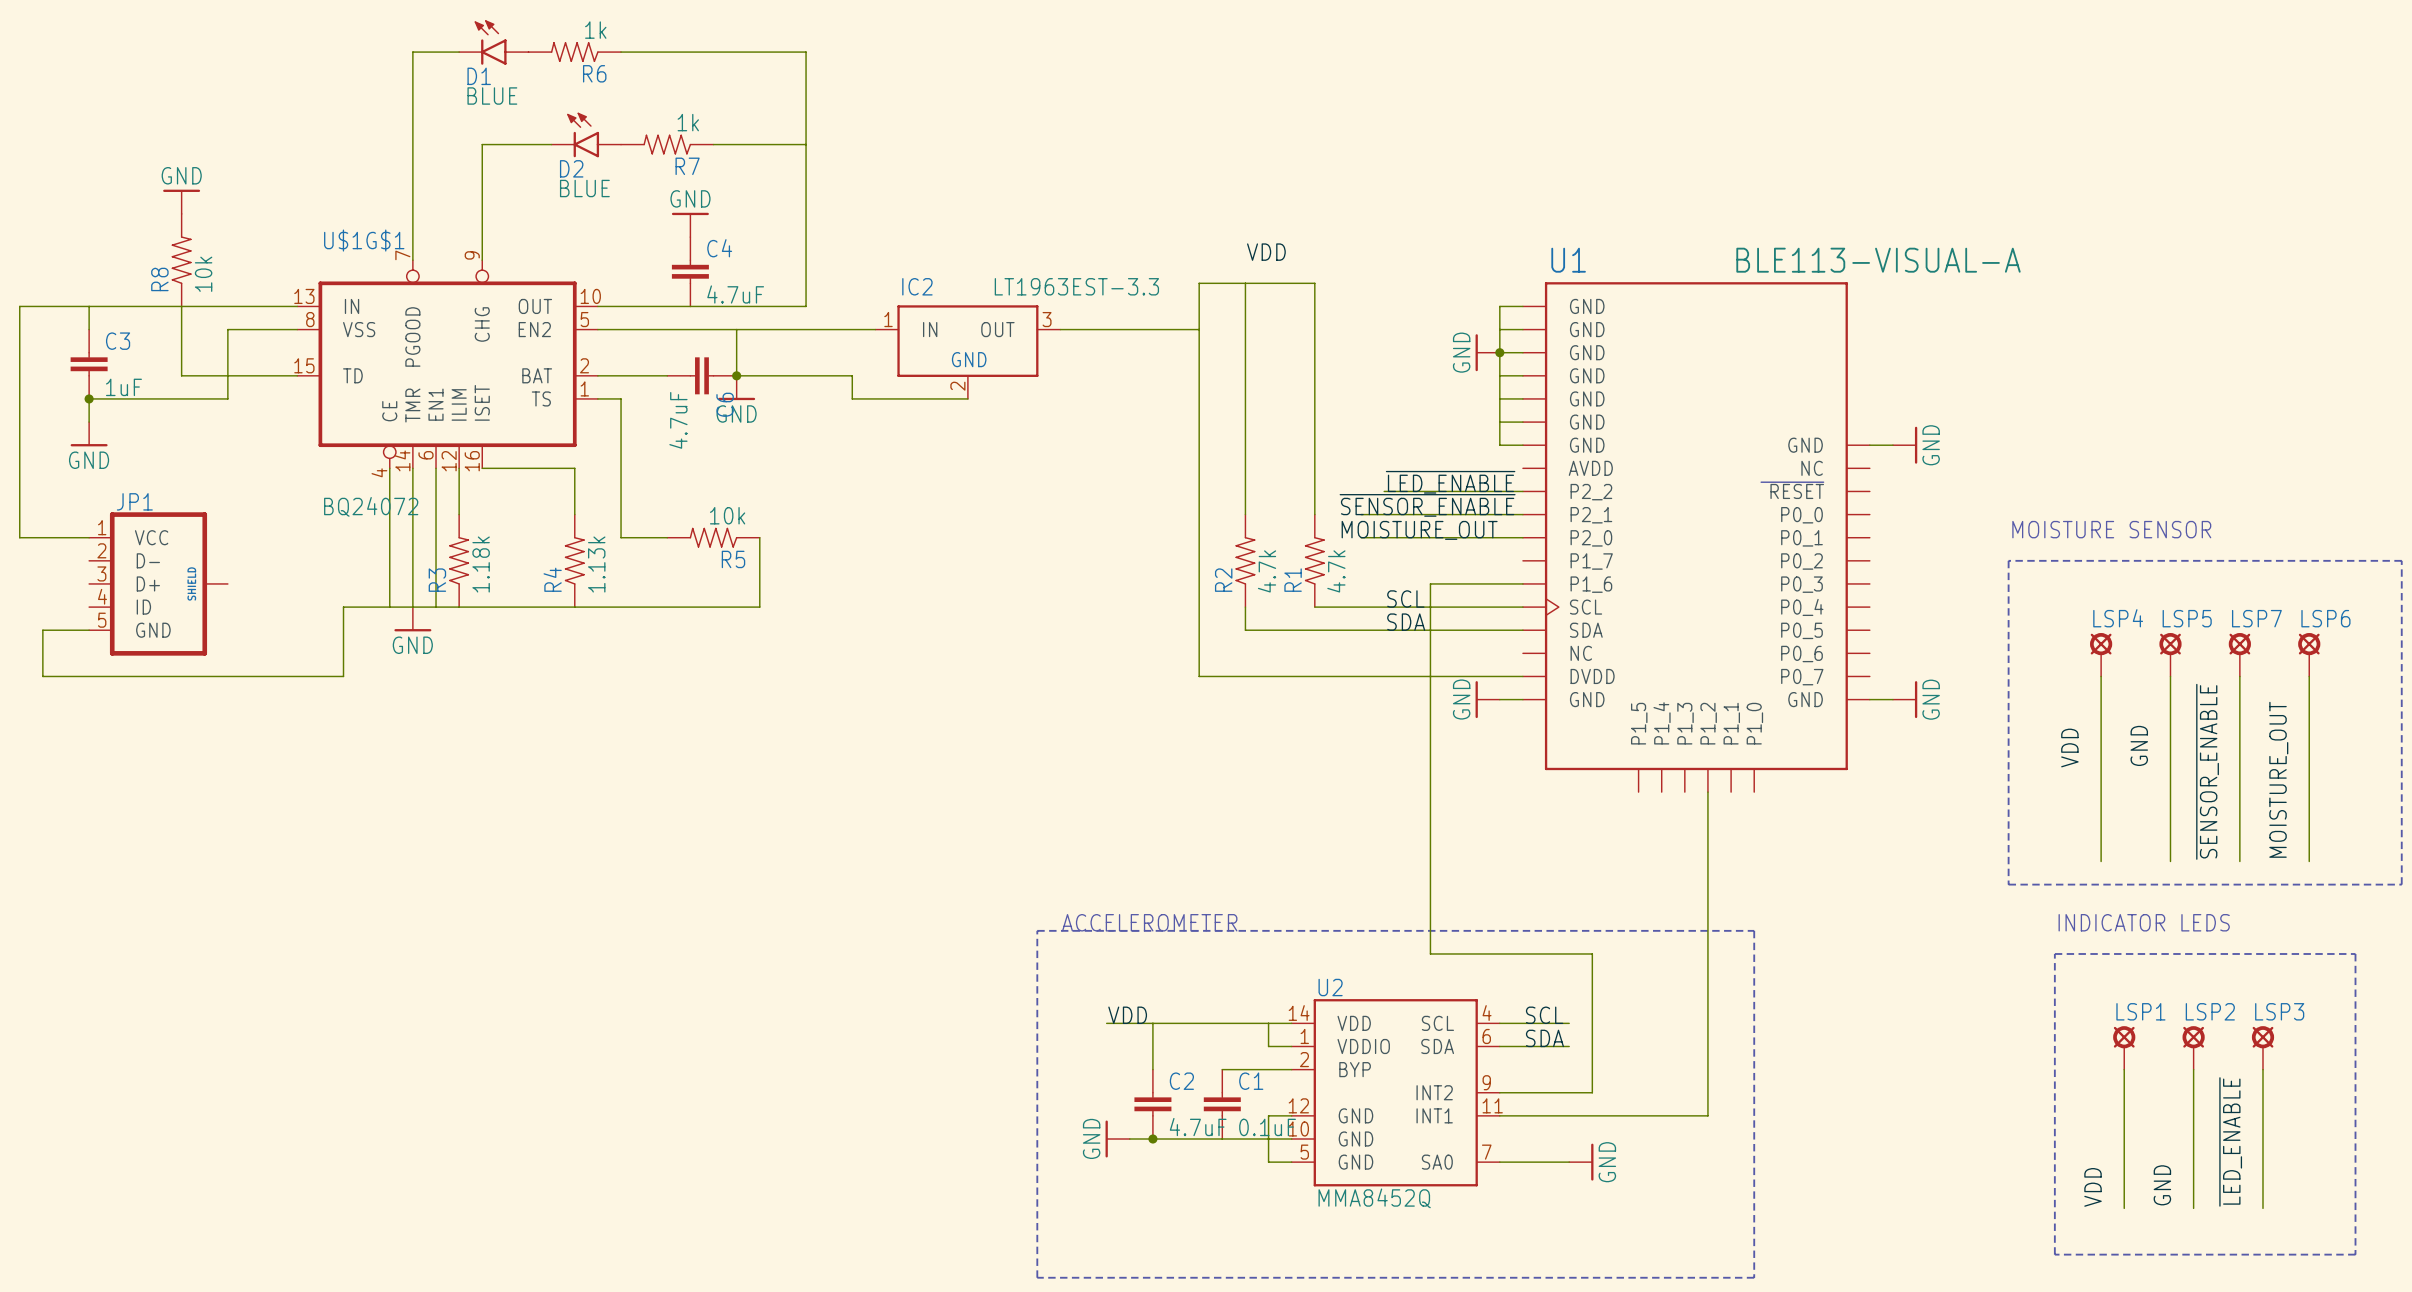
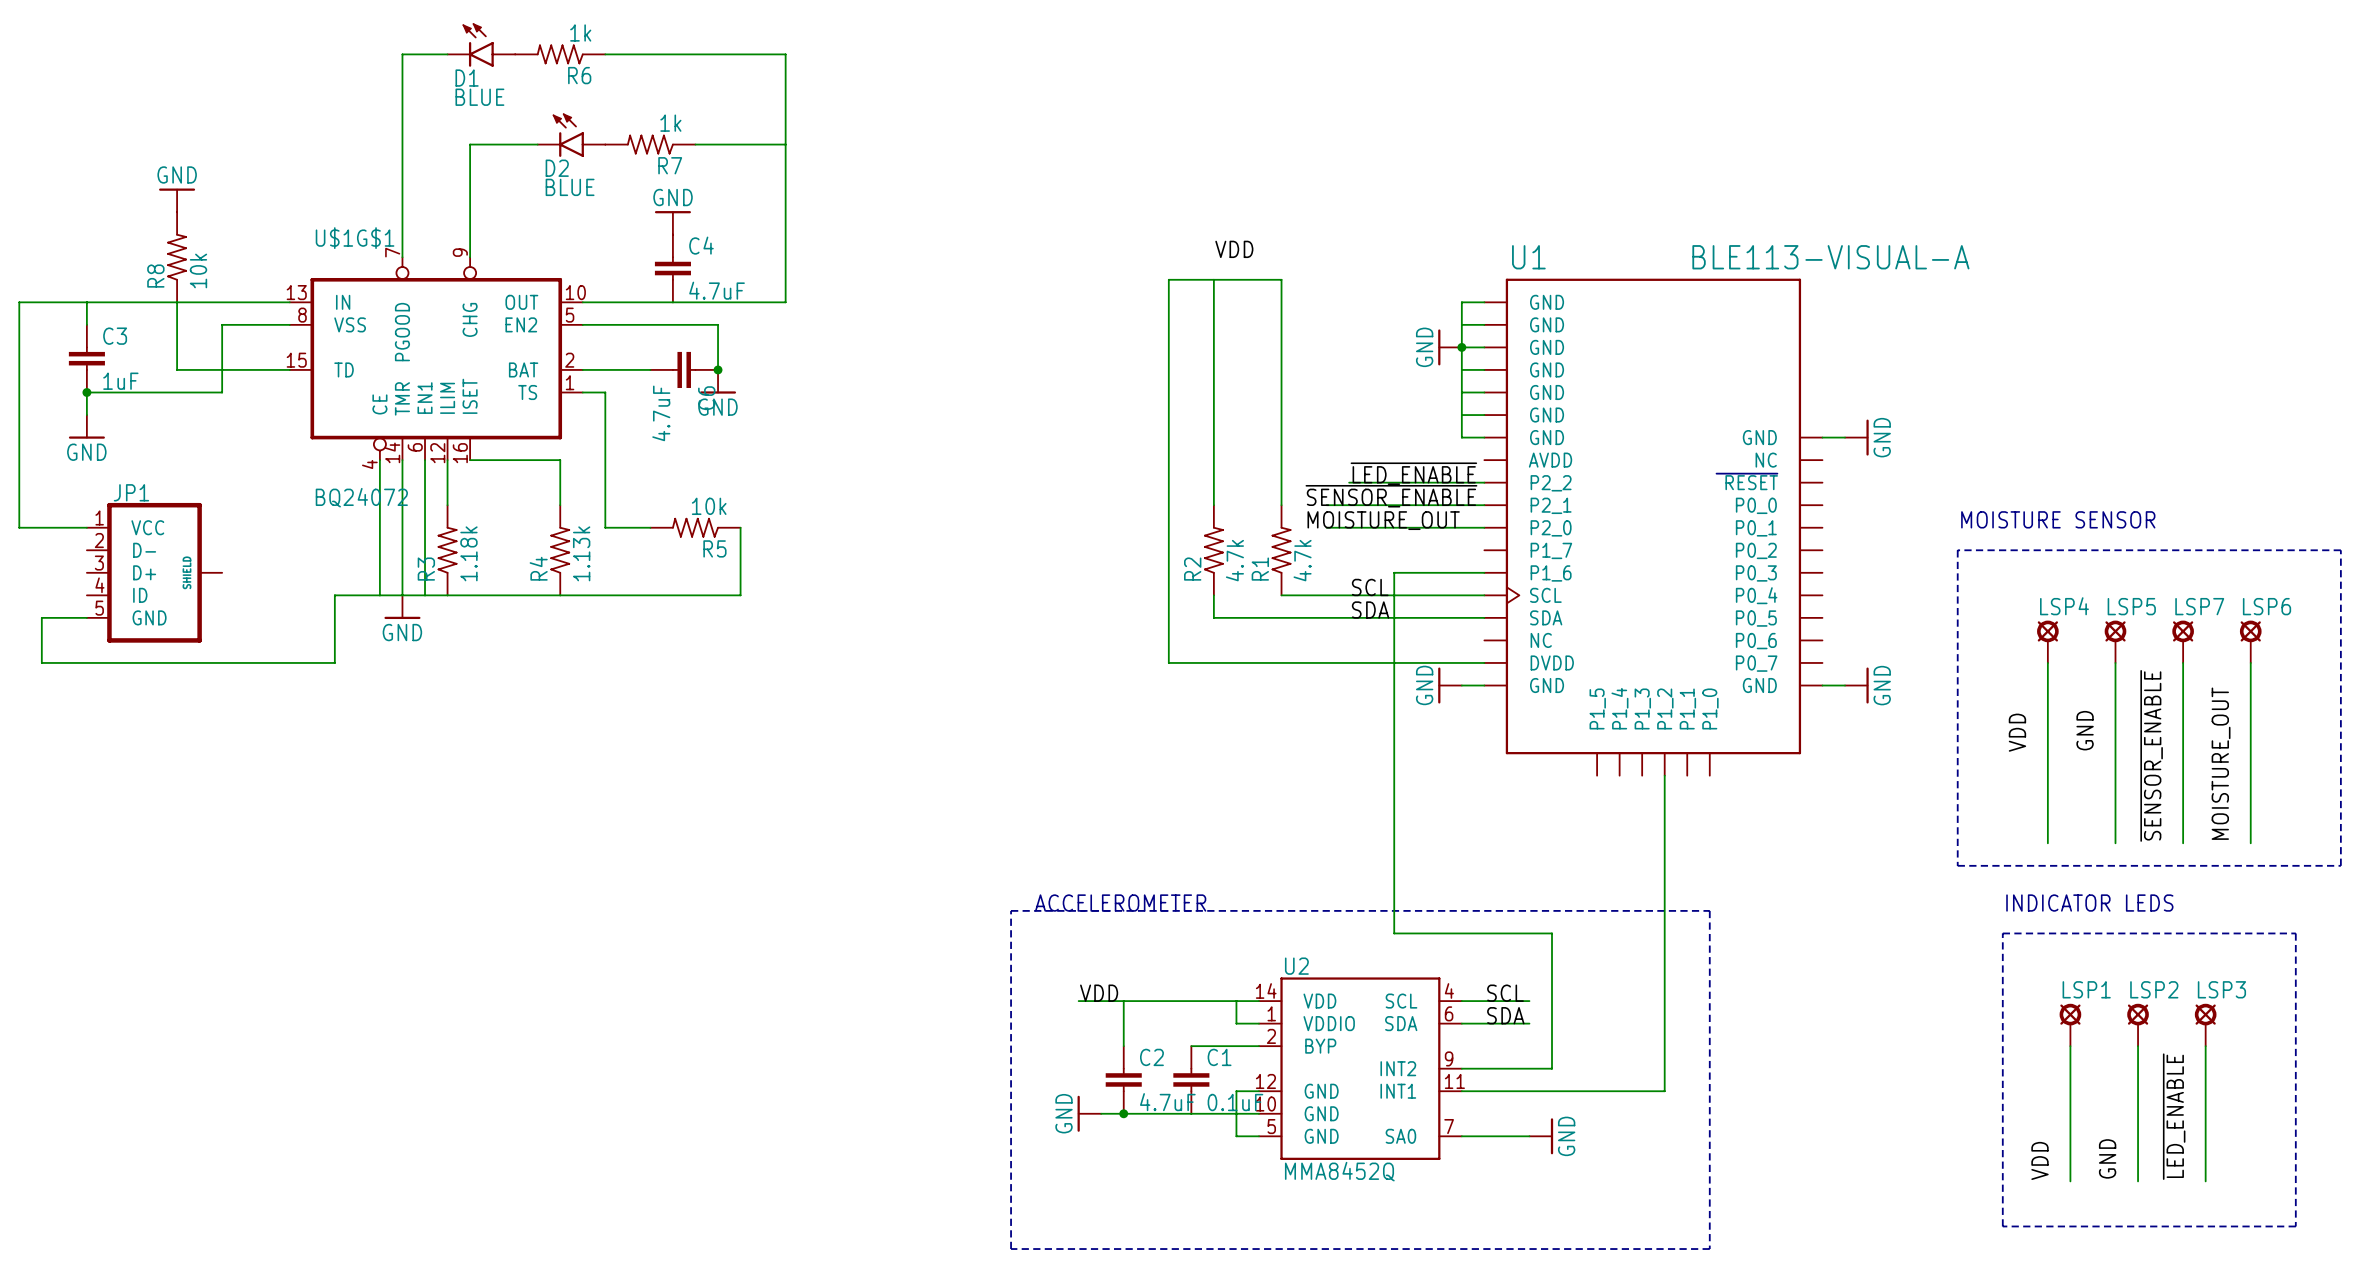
wire: (736, 329) (875, 329) -> none
wire: (1060, 329) (1199, 329) -> none
IC2: LT1963EST-3.3 (967, 352) -> none
wire: (736, 375) (852, 375) (852, 398) (967, 398) -> none

